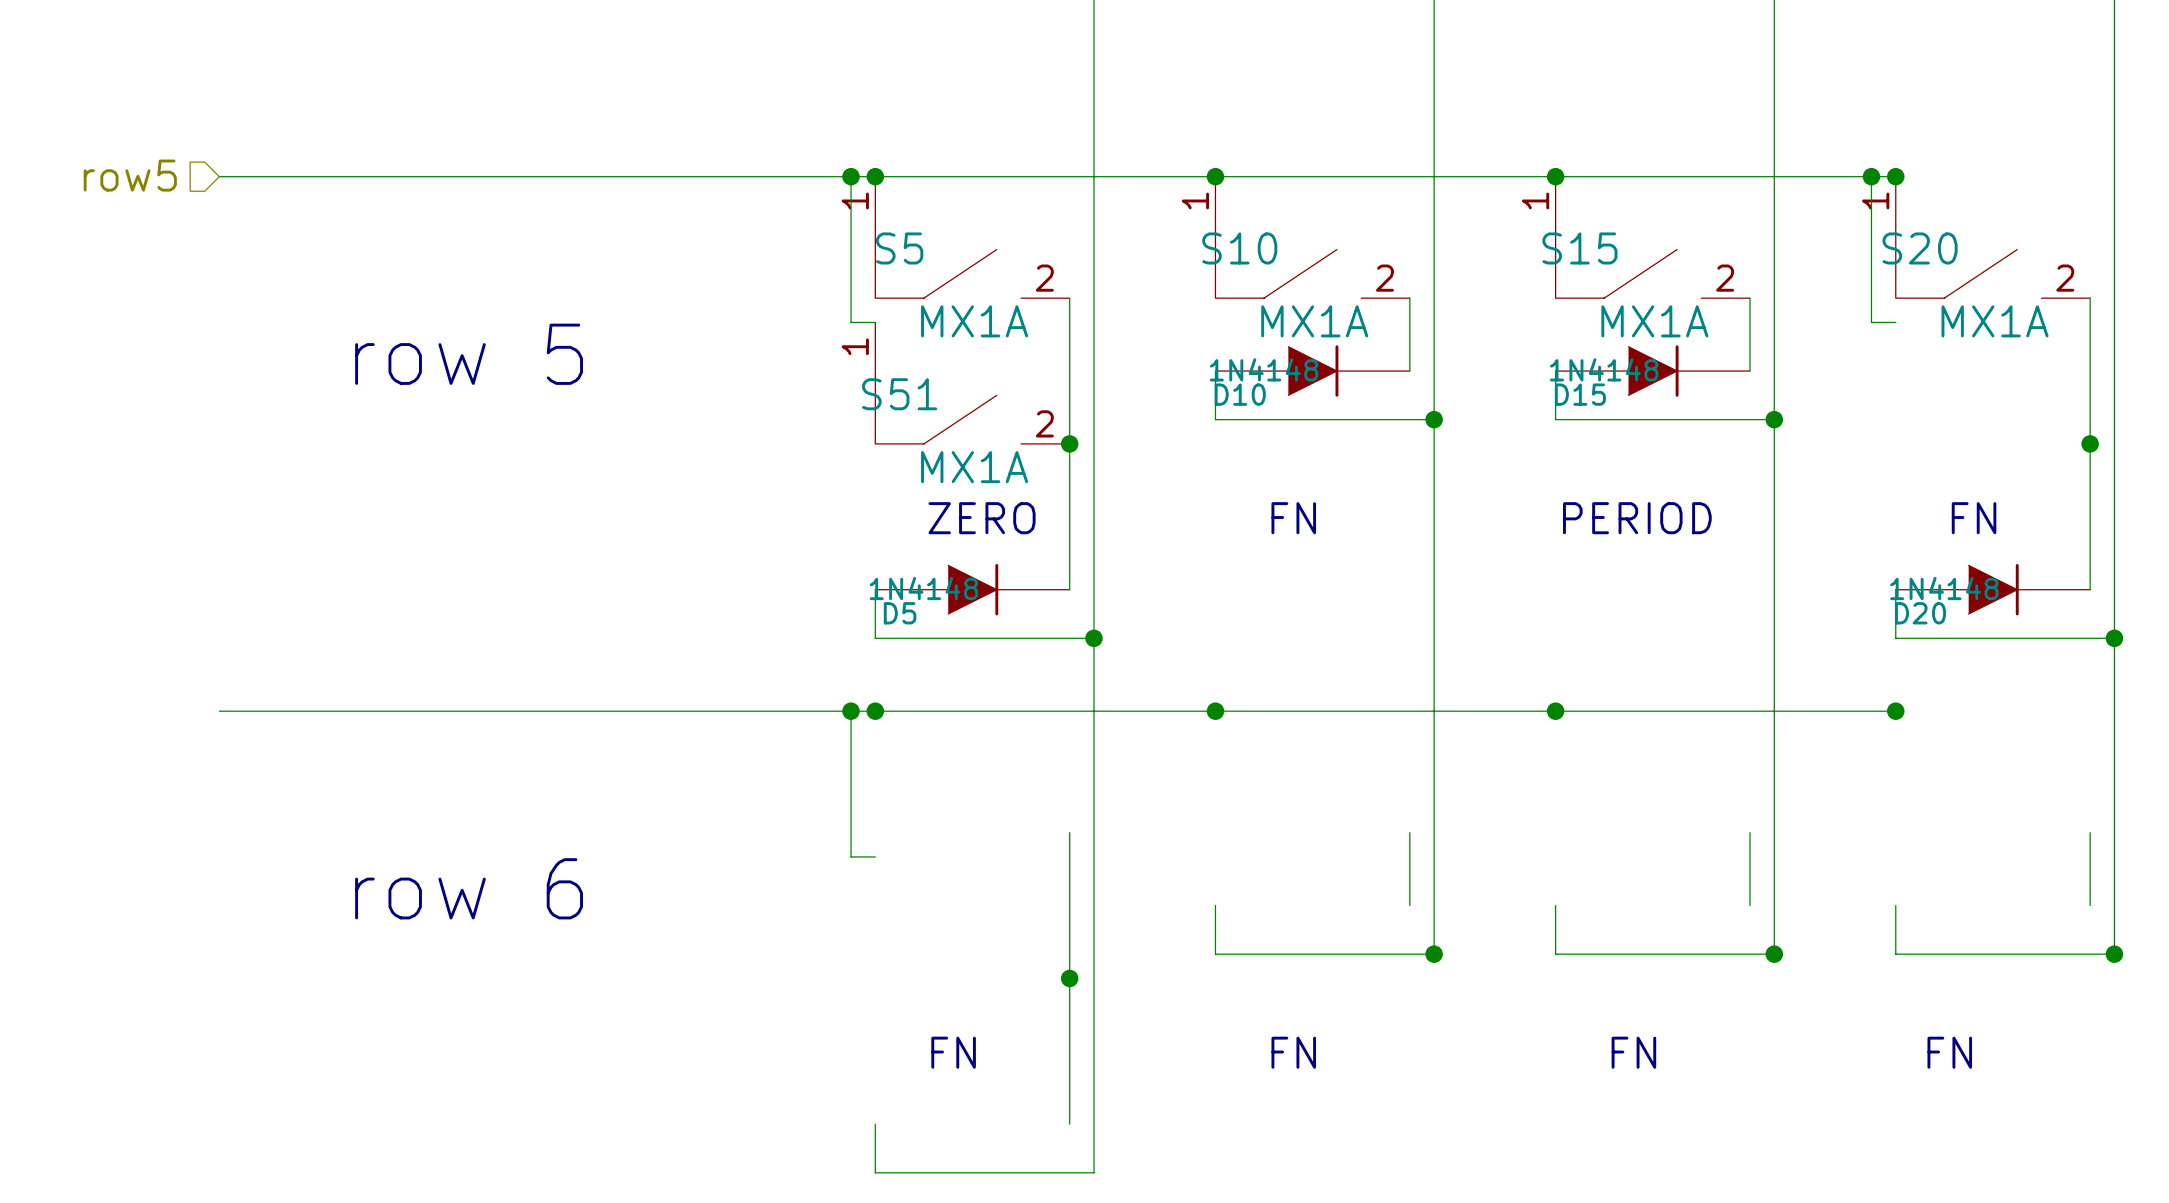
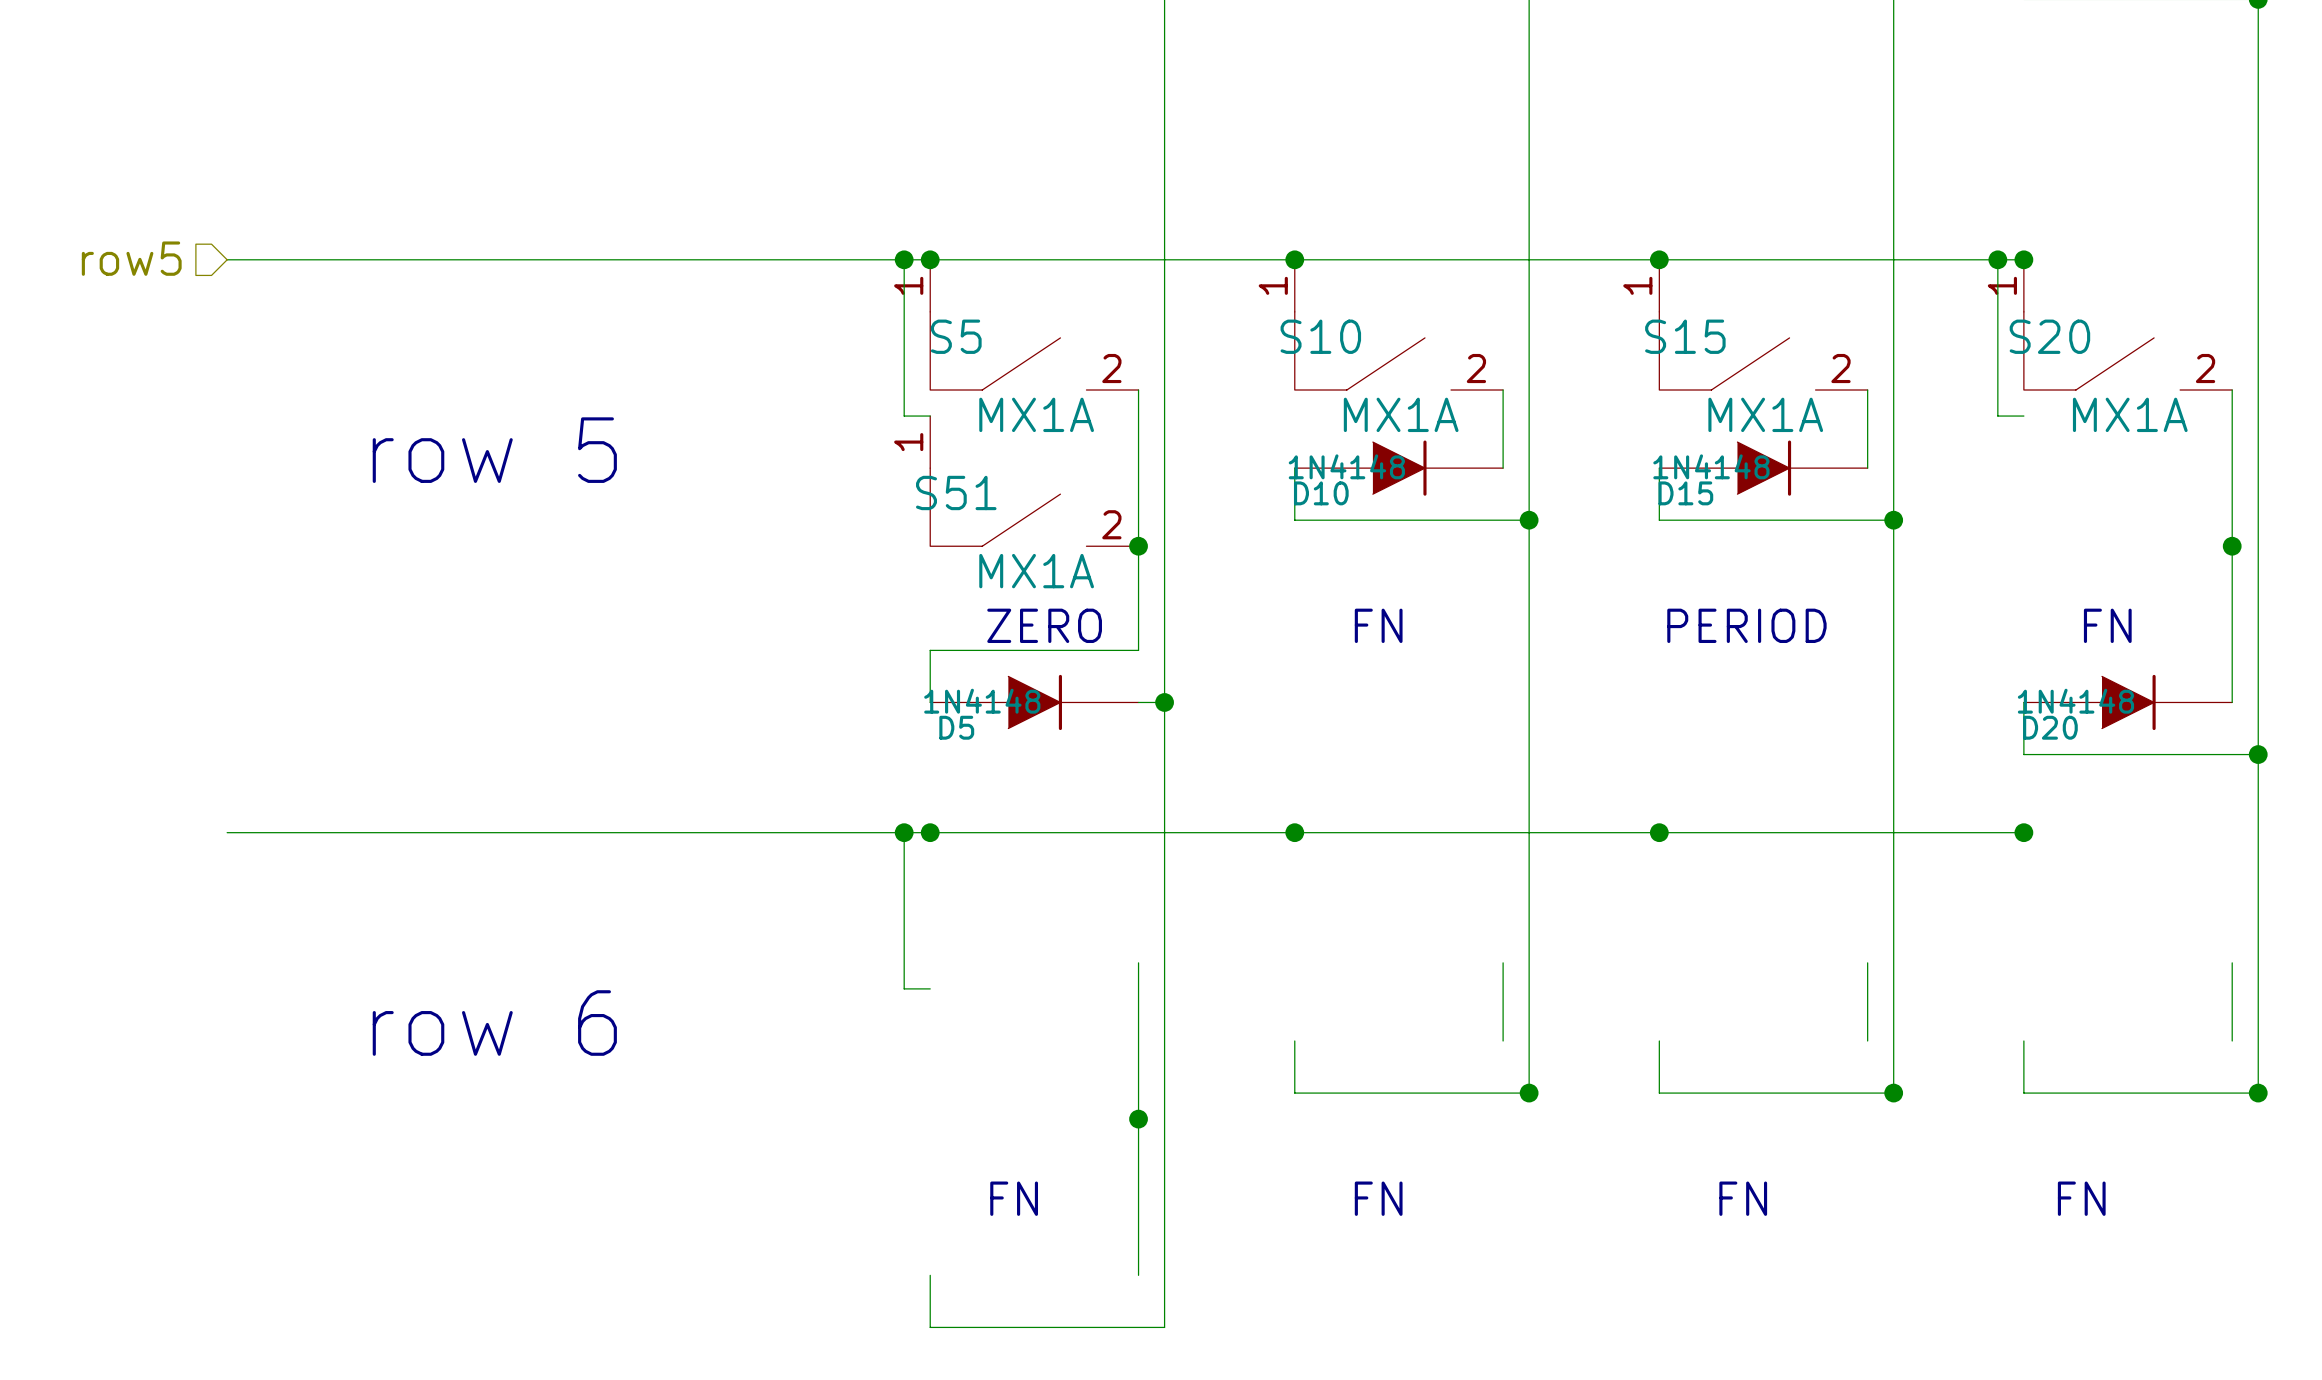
wire: (1069, 541) (1069, 589) -> (1164, 702) (1138, 702)
wire: (875, 589) (875, 638) (1093, 638) -> (930, 702) (930, 650) (1138, 650)
junction position: (1093, 638) -> (1164, 702)

